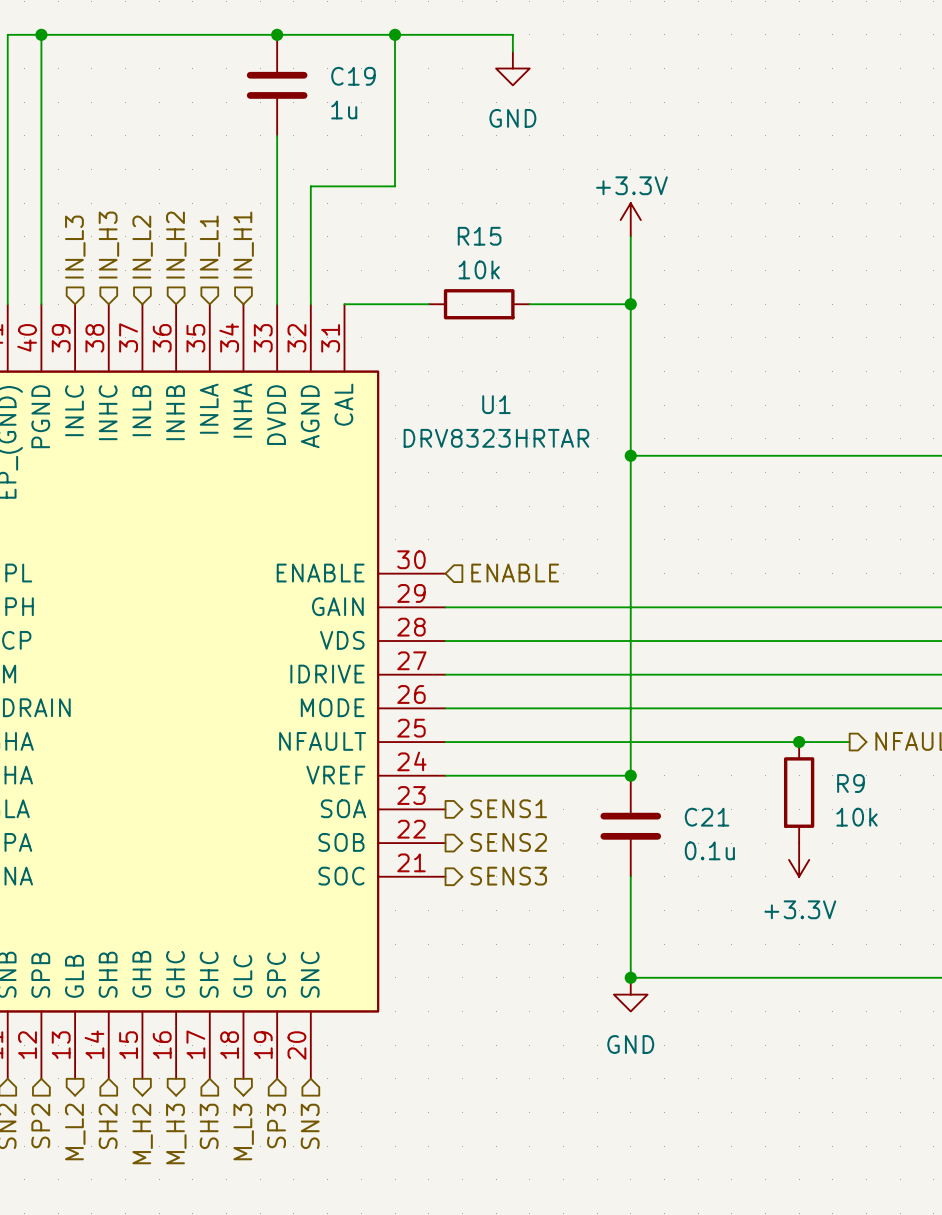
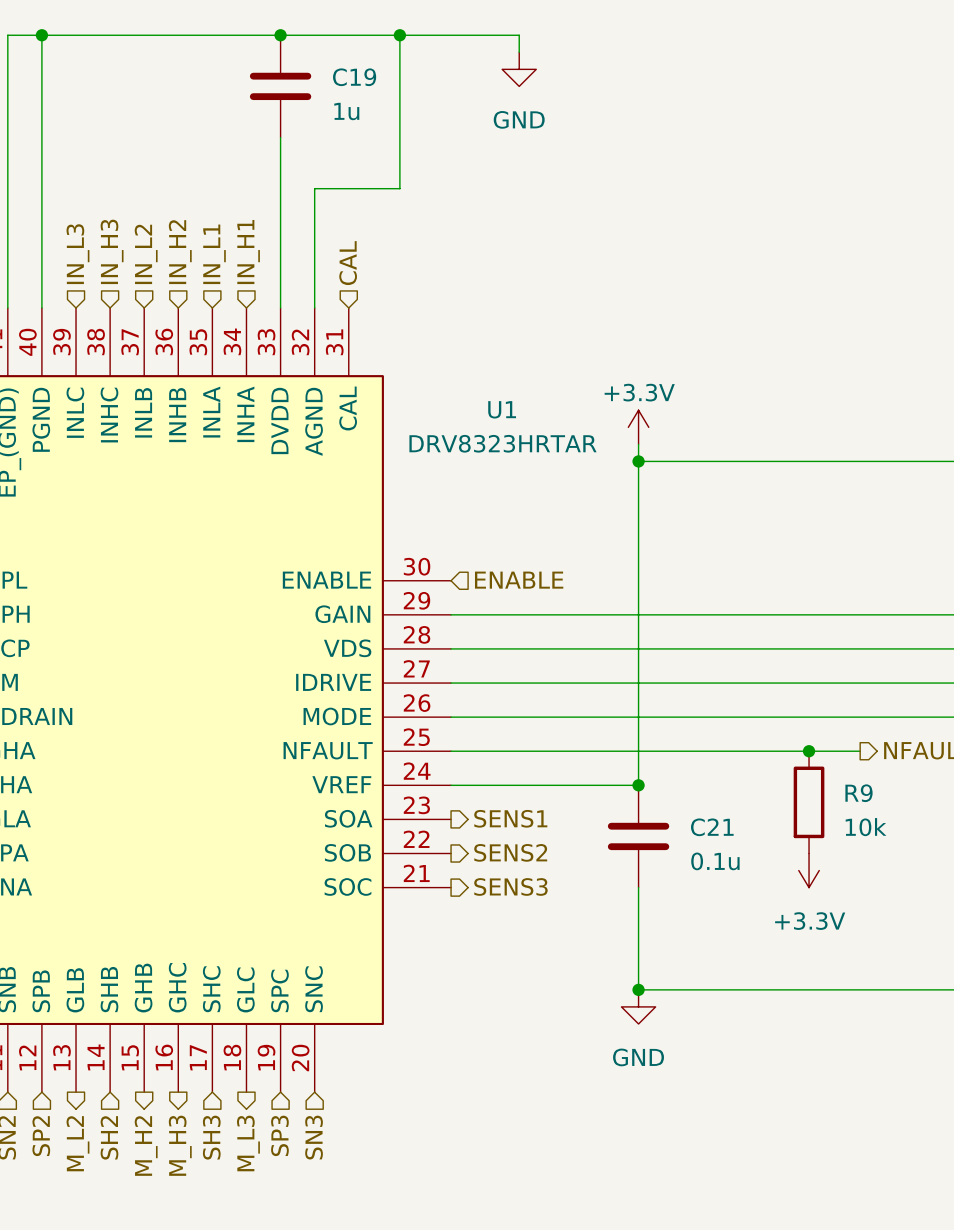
power symbol position: +3.3V (630, 220) -> +3.3V (638, 427)
wire: (630, 236) (630, 438) -> none
hierarchical label: none -> CAL (348, 263)
wire: (344, 304) (428, 304) -> none
R15: 10k (479, 304) -> none
wire: (529, 304) (630, 304) -> none
junction: (630, 304) -> none

